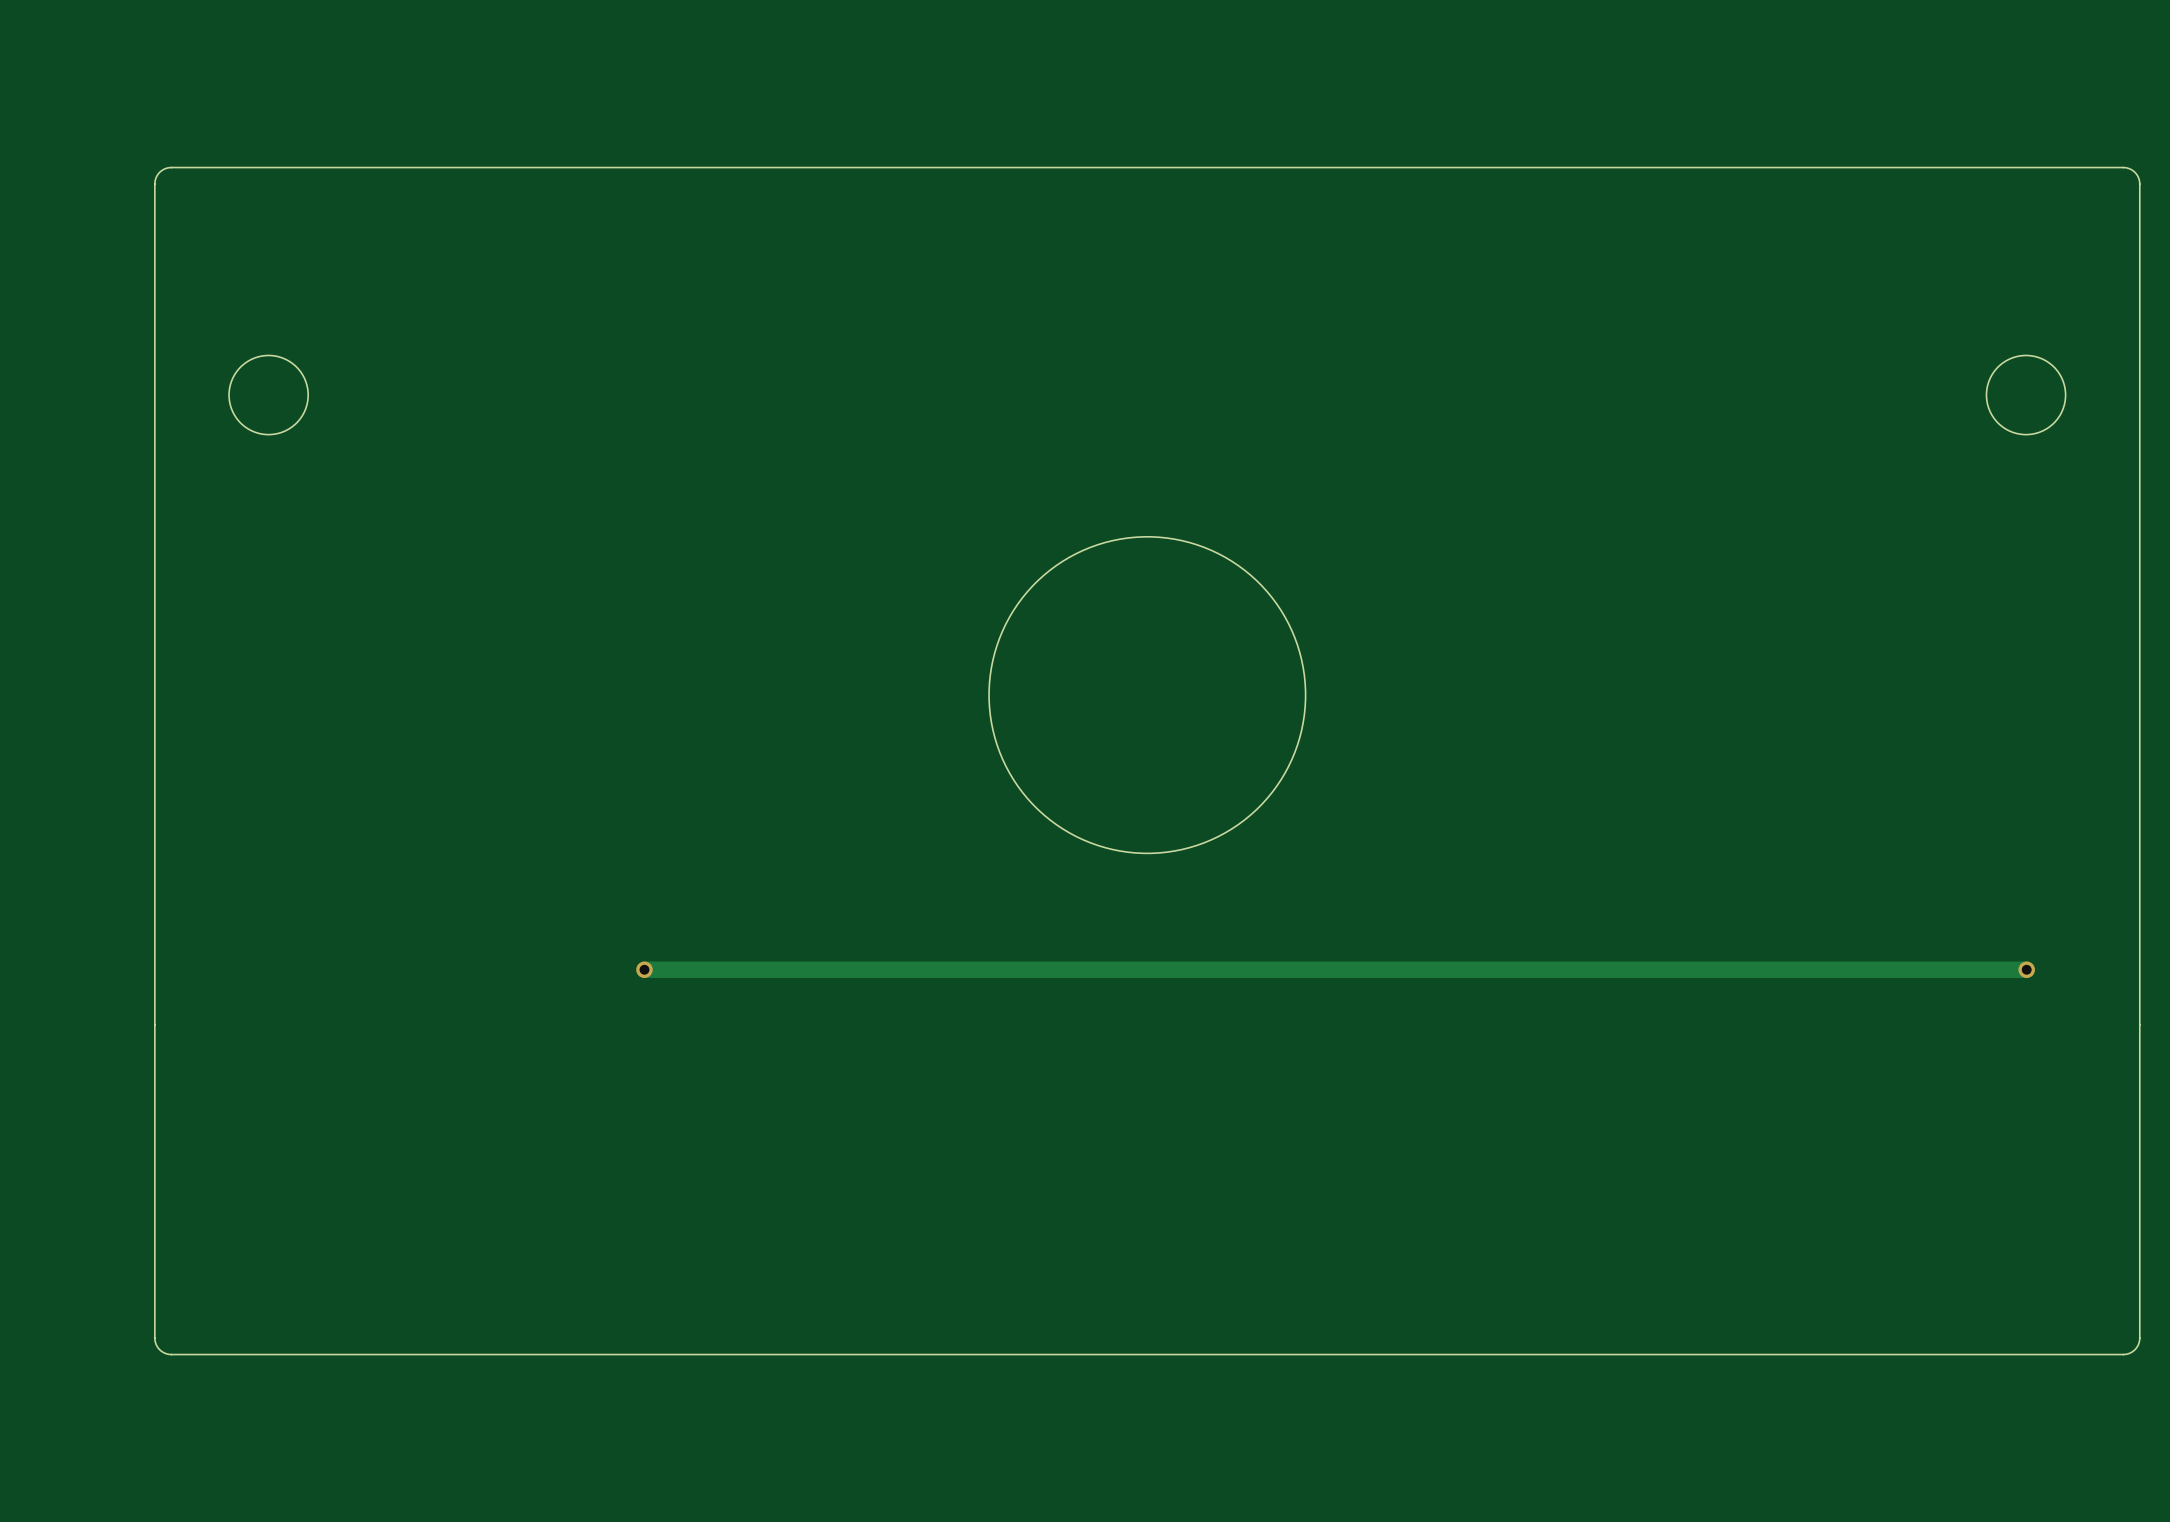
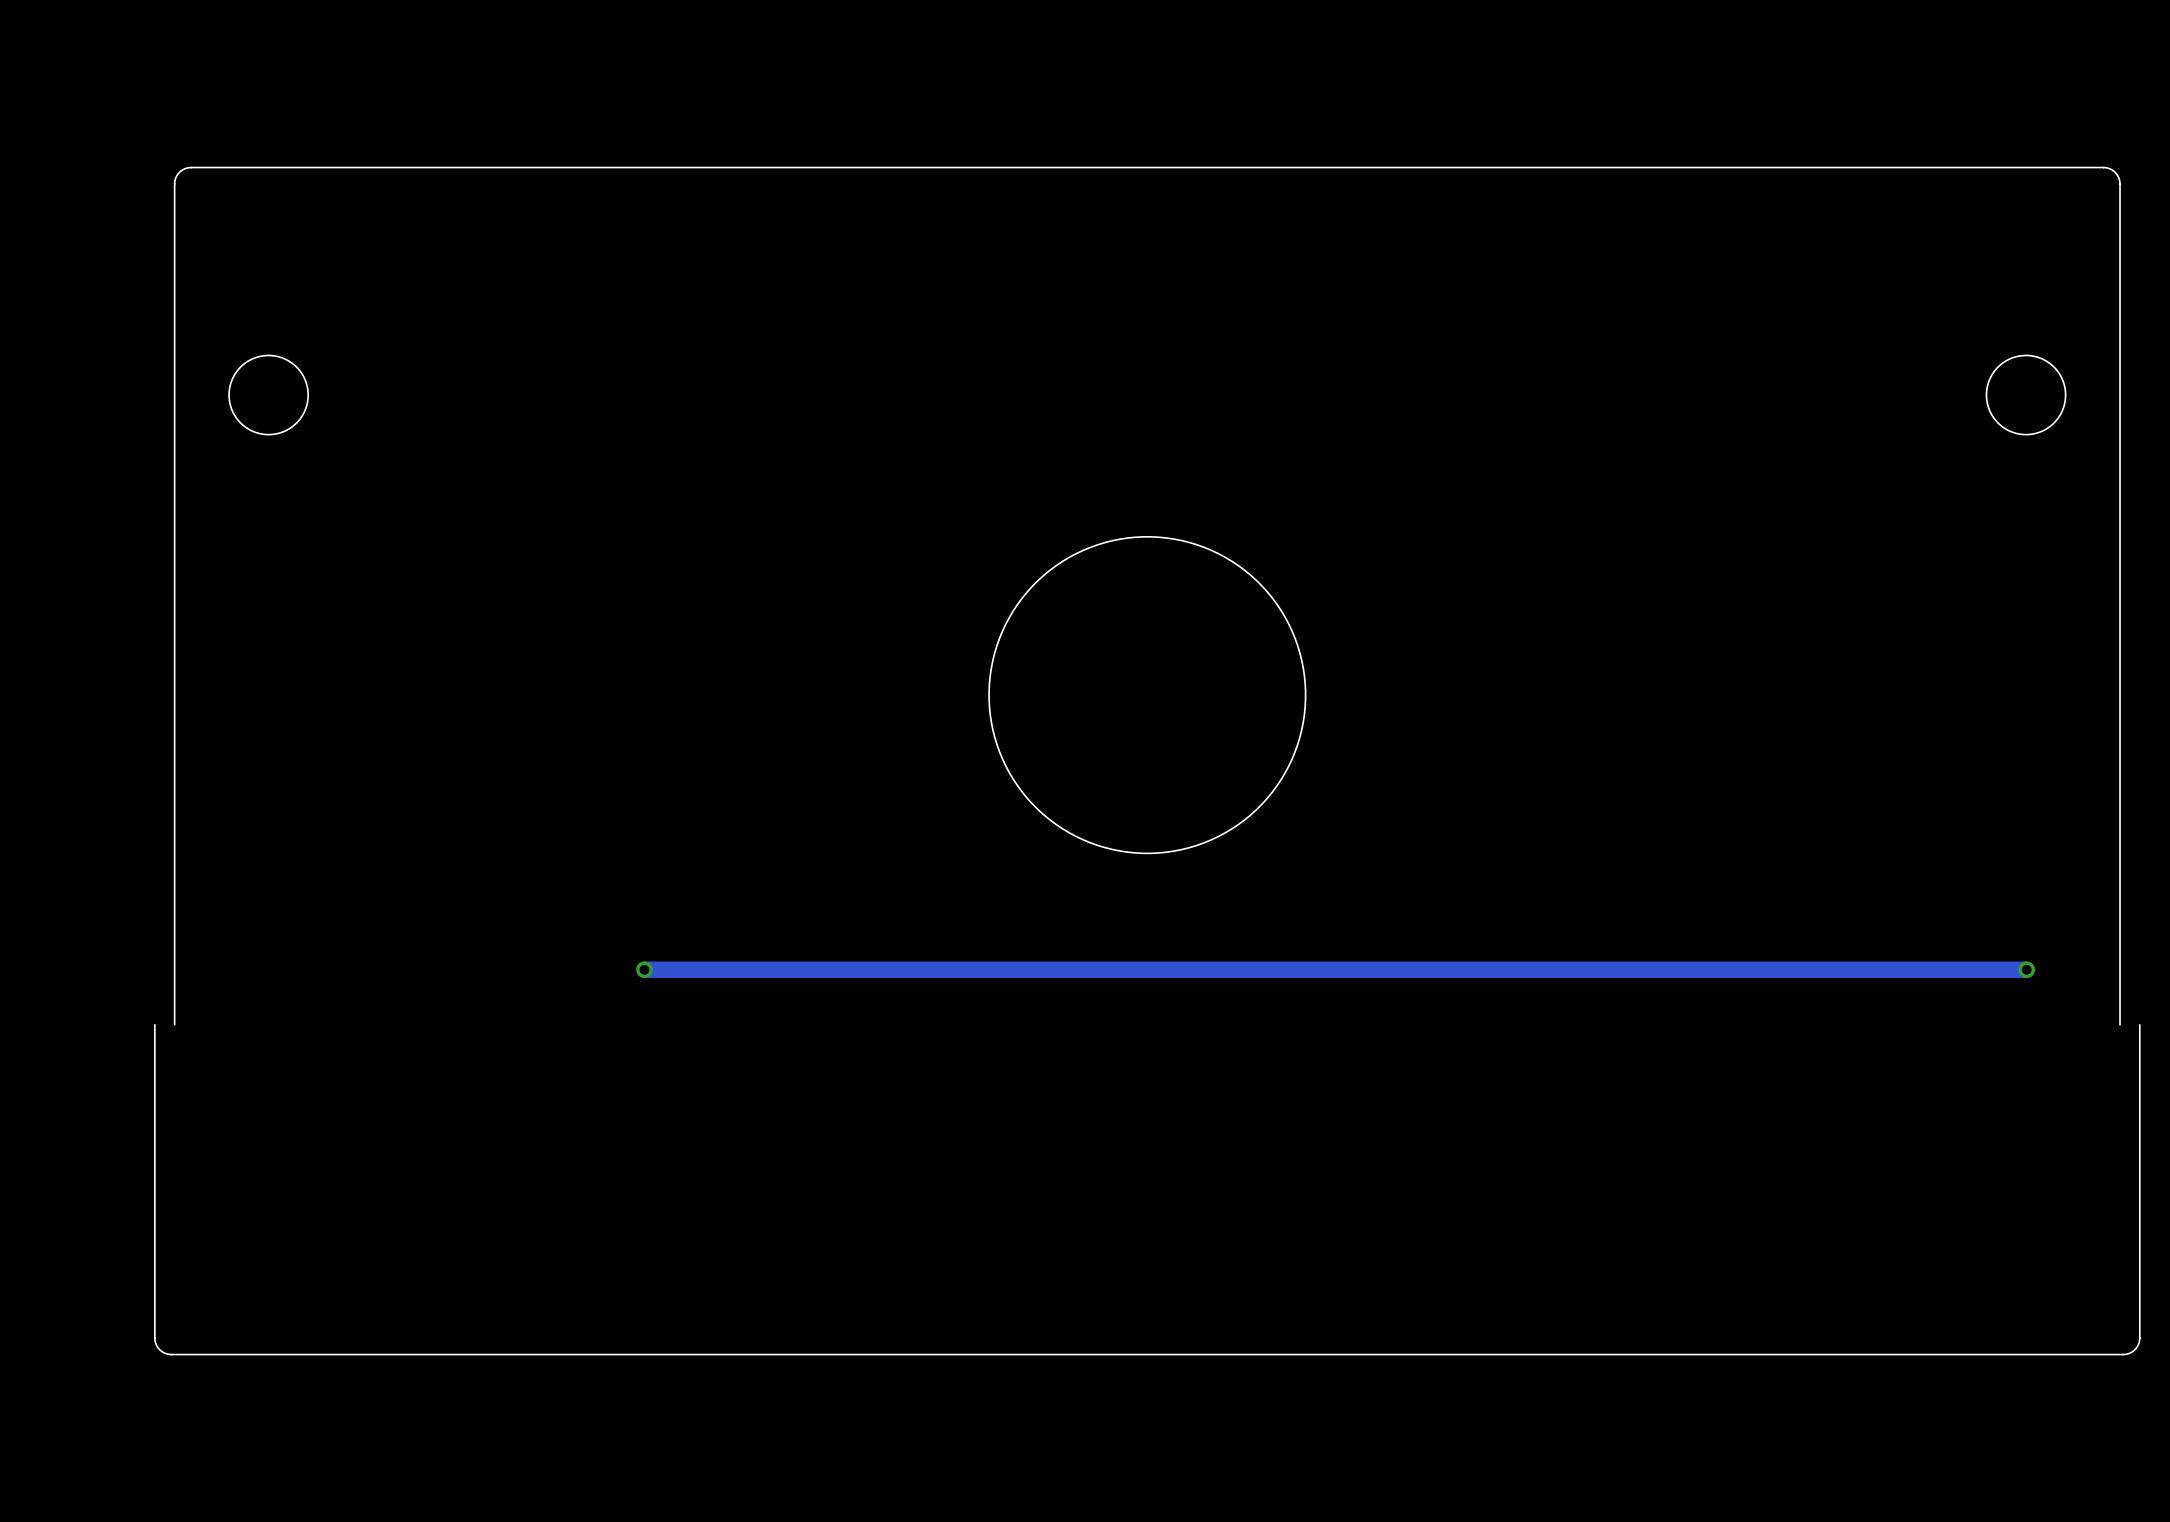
board edge: (191, 167) (165, 168) (158, 173) (154, 184) (154, 1024) -> (191, 167) (179, 172) (174, 184) (174, 1024)
board edge: (2103, 167) (2129, 168) (2137, 175) (2139, 184) (2139, 1024) -> (2103, 167) (2115, 172) (2120, 184) (2120, 1024)

